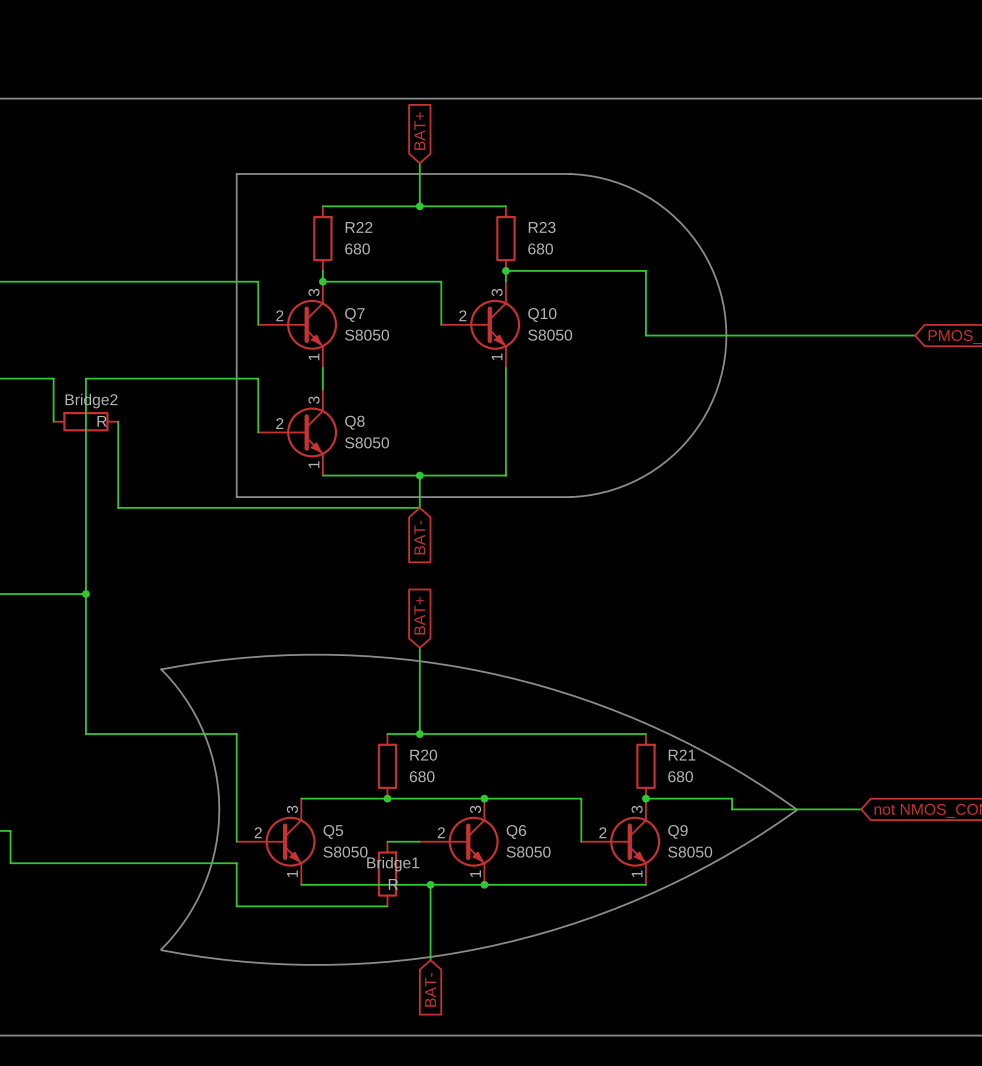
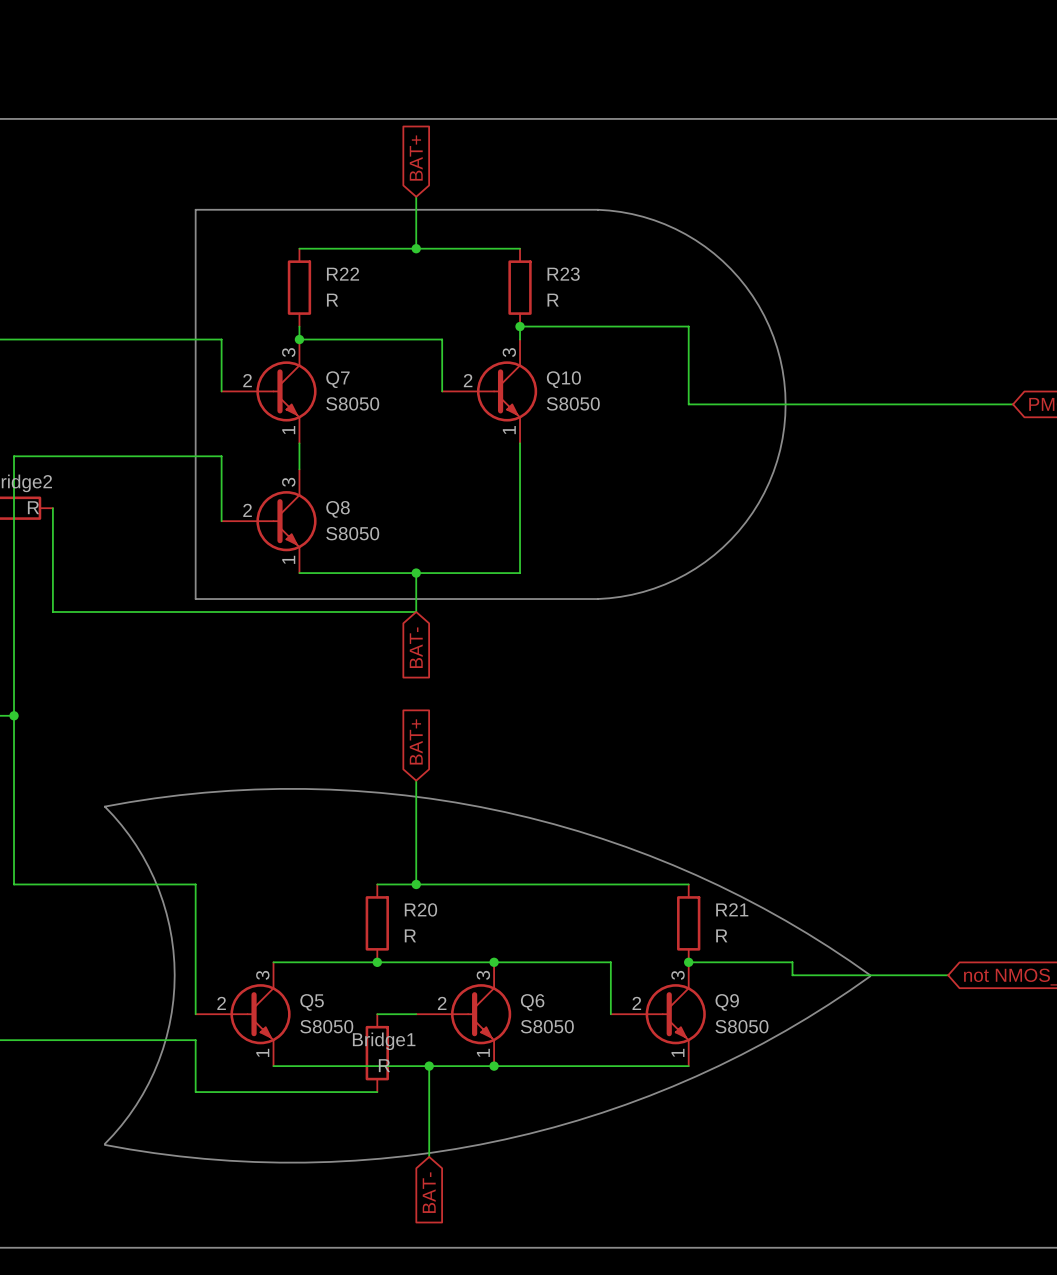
R22 value: 680 (357, 248) -> R (332, 300)
R23 value: 680 (540, 248) -> R (553, 300)
R20 value: 680 (422, 776) -> R (410, 935)
R21 value: 680 (680, 776) -> R (721, 935)

